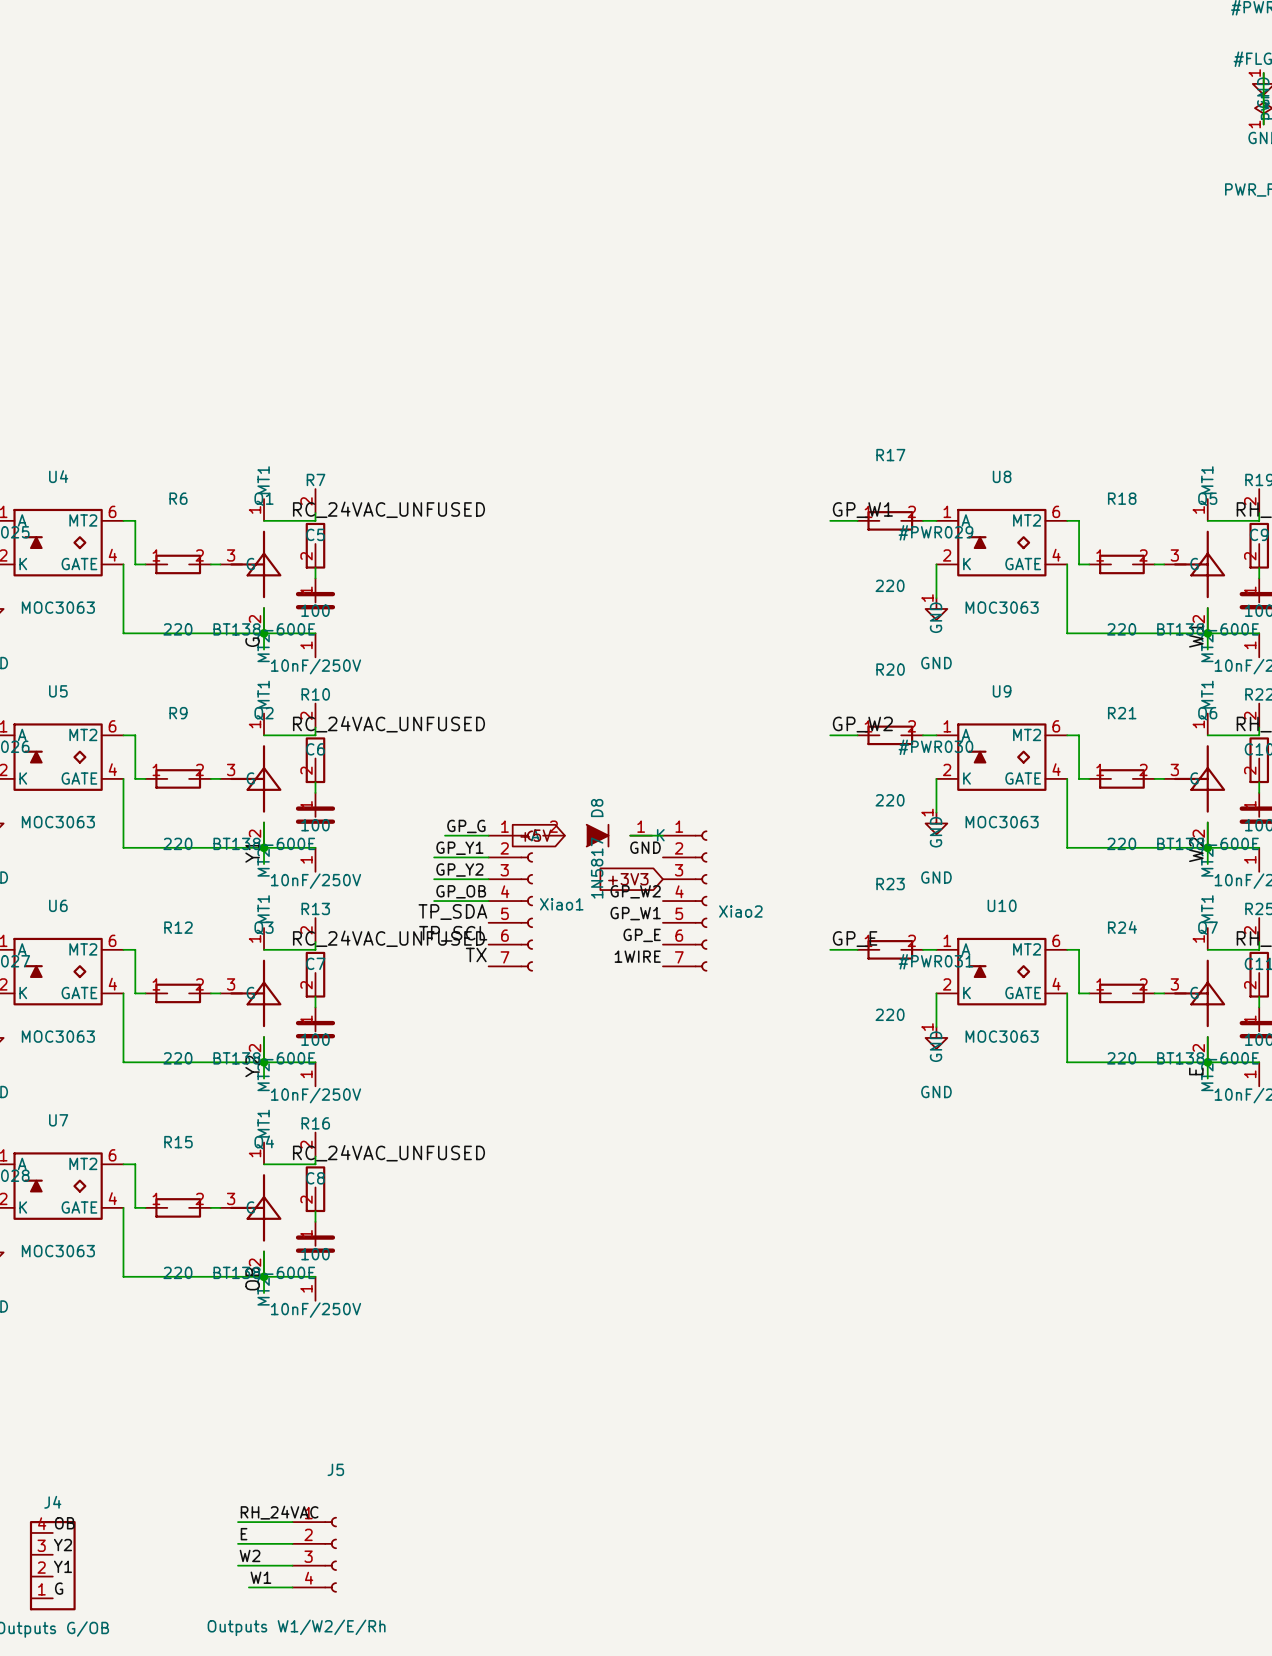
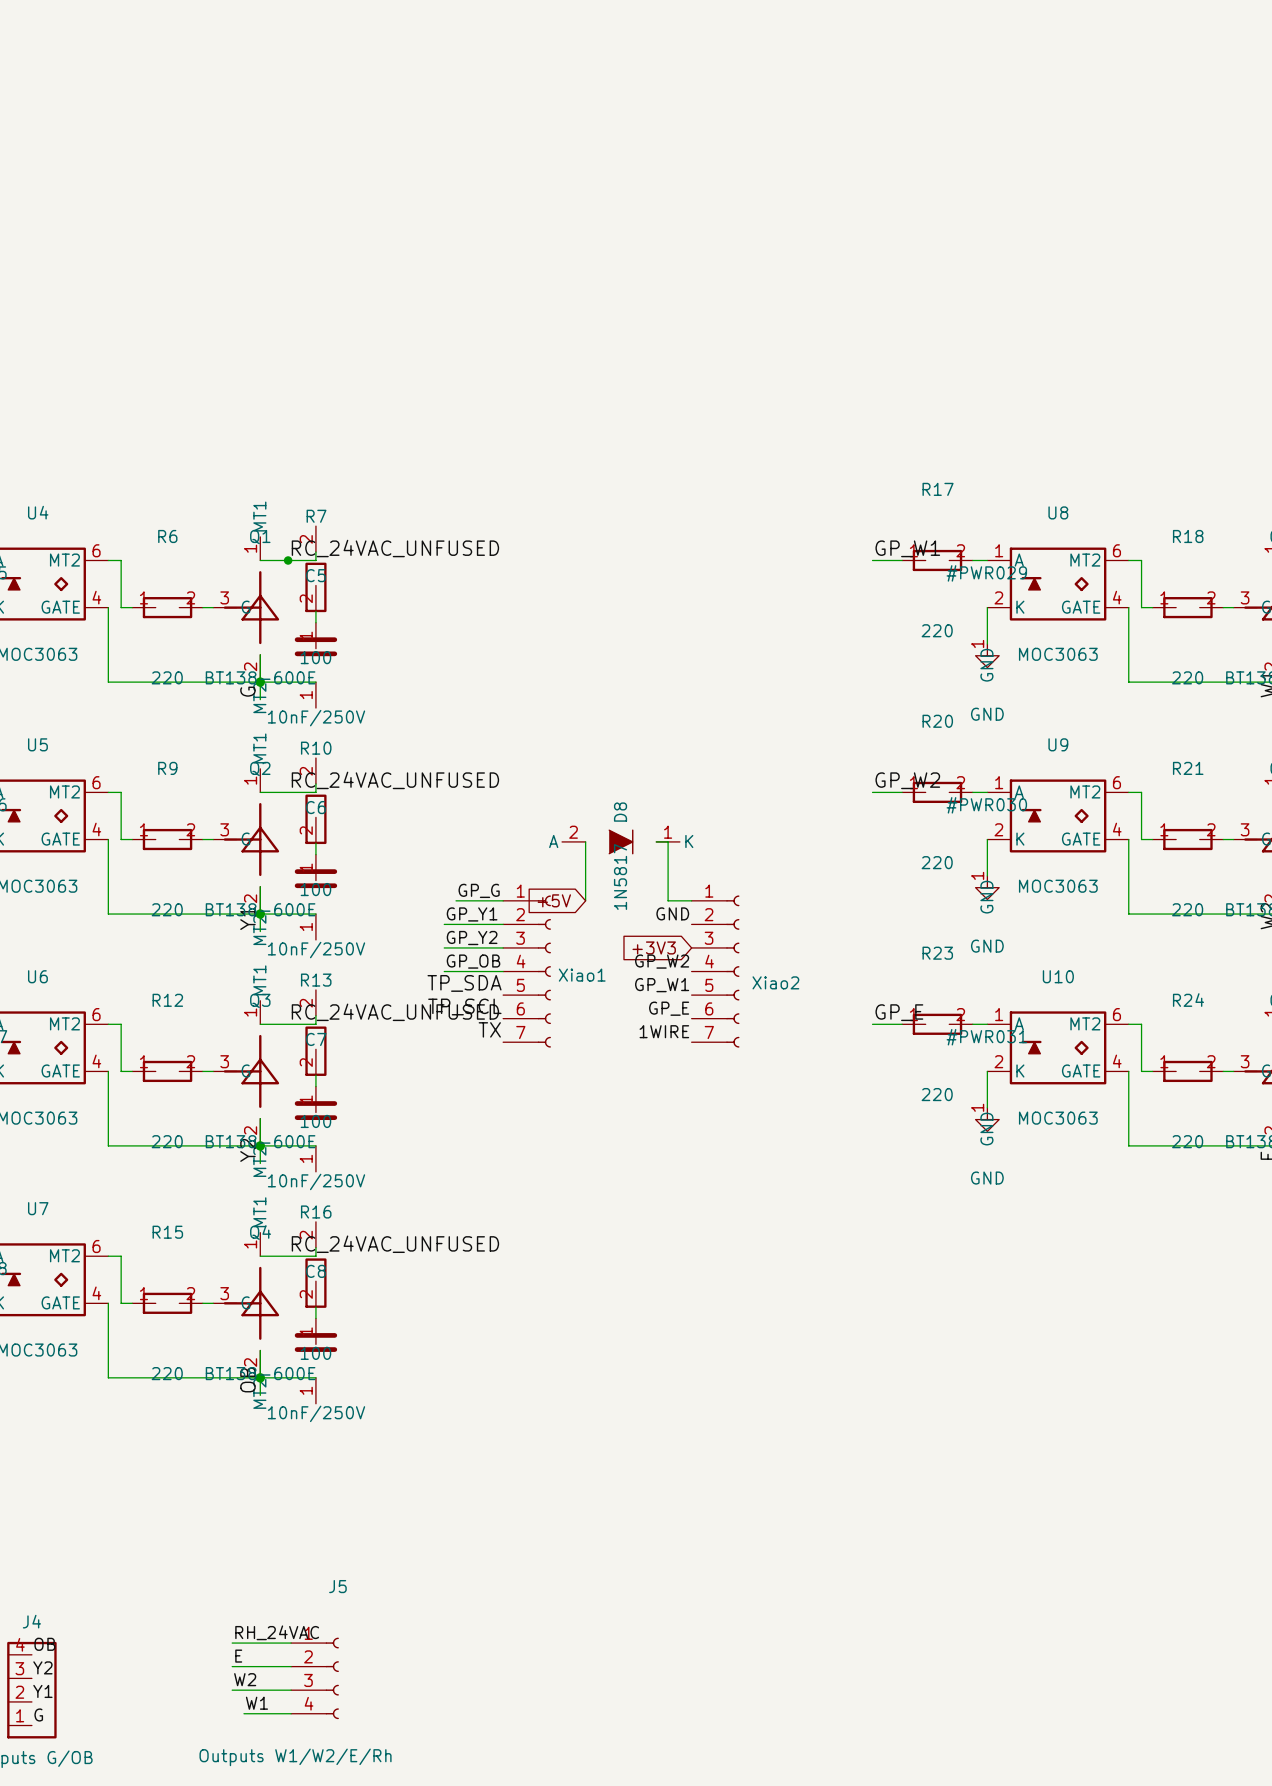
junction: none -> (288, 560)
wire: none -> (585, 841) (585, 900)
D8 position: (597, 835) -> (620, 841)
wire: (630, 835) (641, 835) -> (656, 841) (668, 841) (668, 900)

